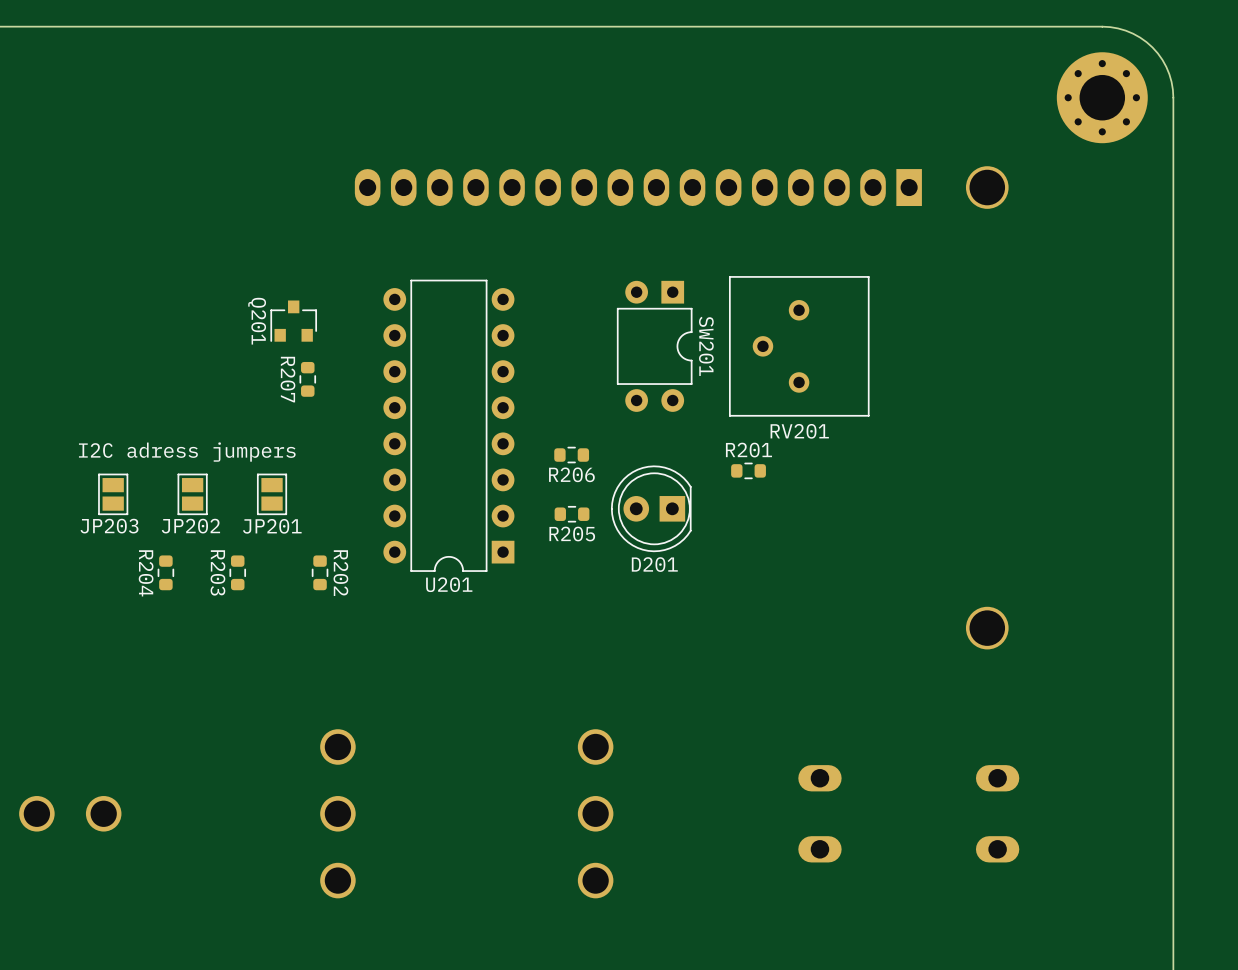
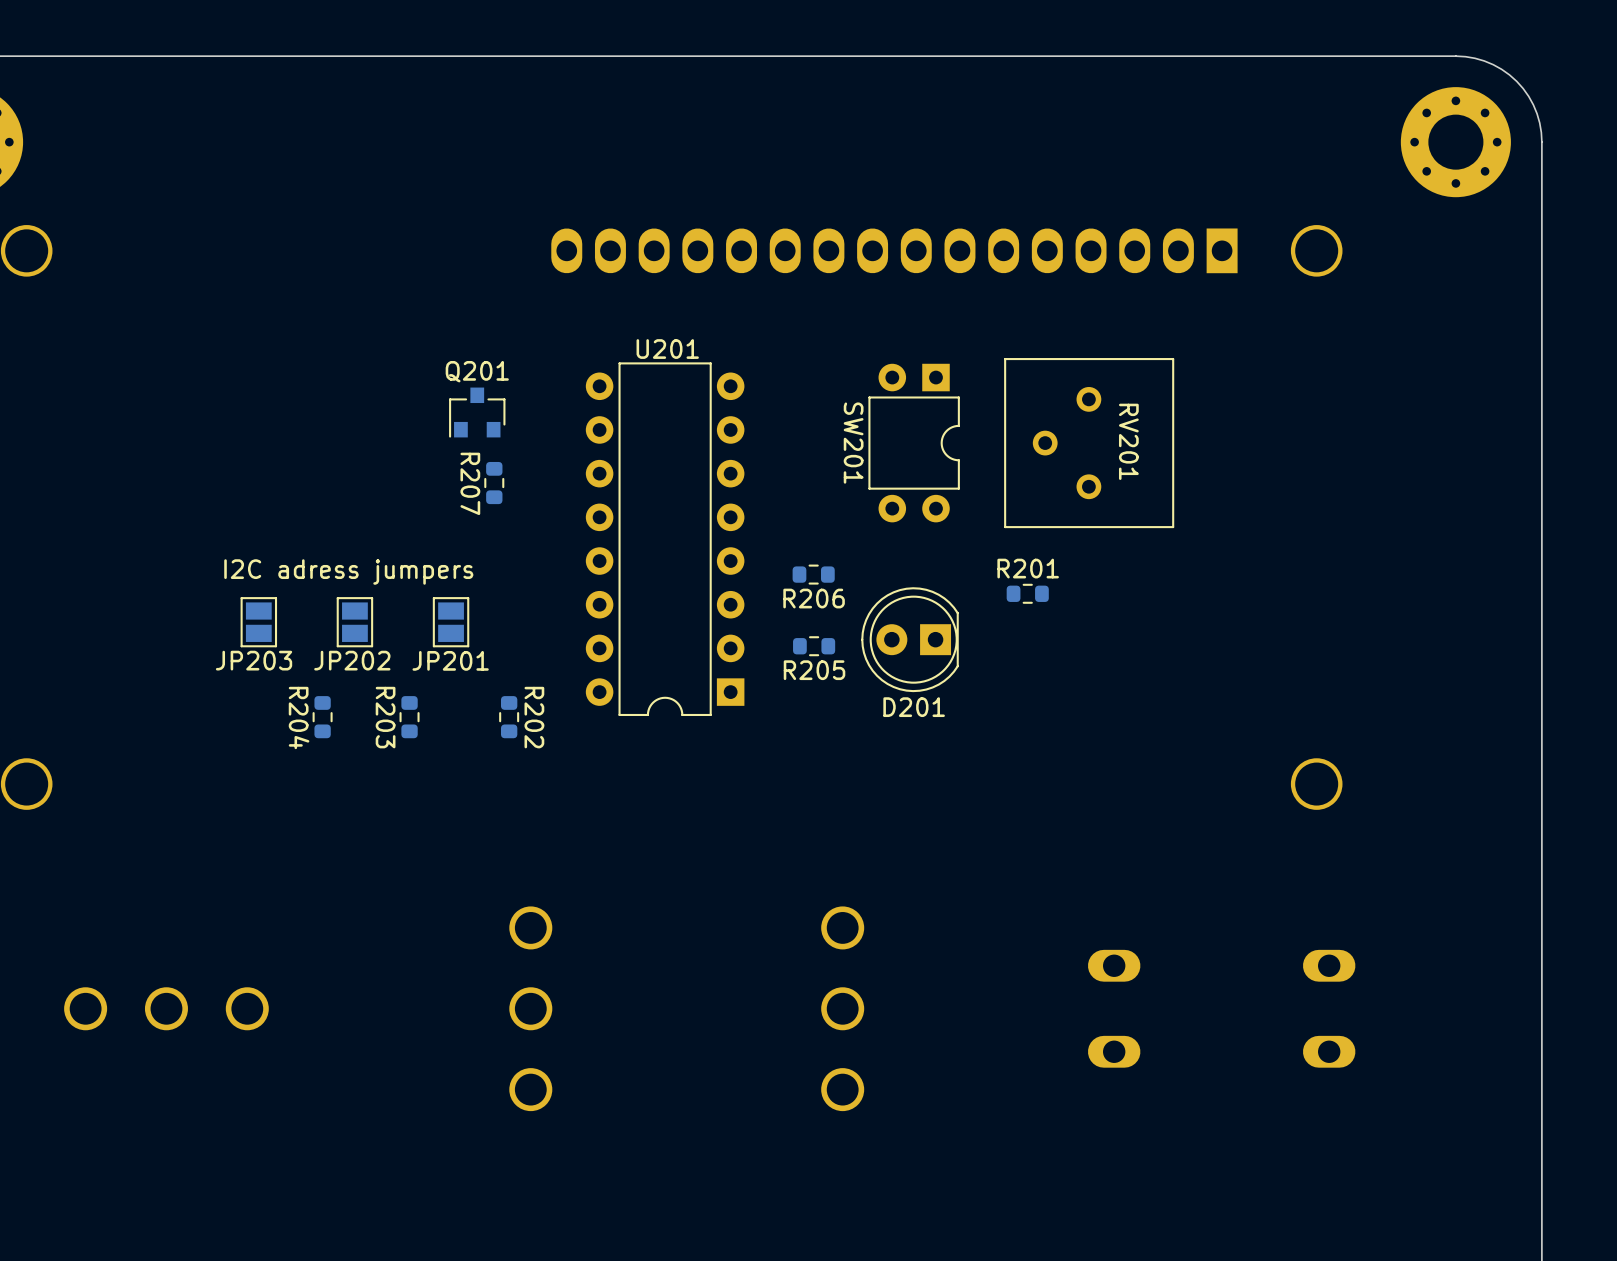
Q201 name rotation: 0° (257, 321) -> 90° counterclockwise (477, 371)
SW201 name position: SW201 (706, 346) -> SW201 (853, 443)
RV201 name rotation: 0° (799, 431) -> 90° clockwise (1128, 441)
RV201 name position: RV201 (799, 431) -> RV201 (1128, 441)
U201 name position: U201 (449, 584) -> U201 (667, 349)

